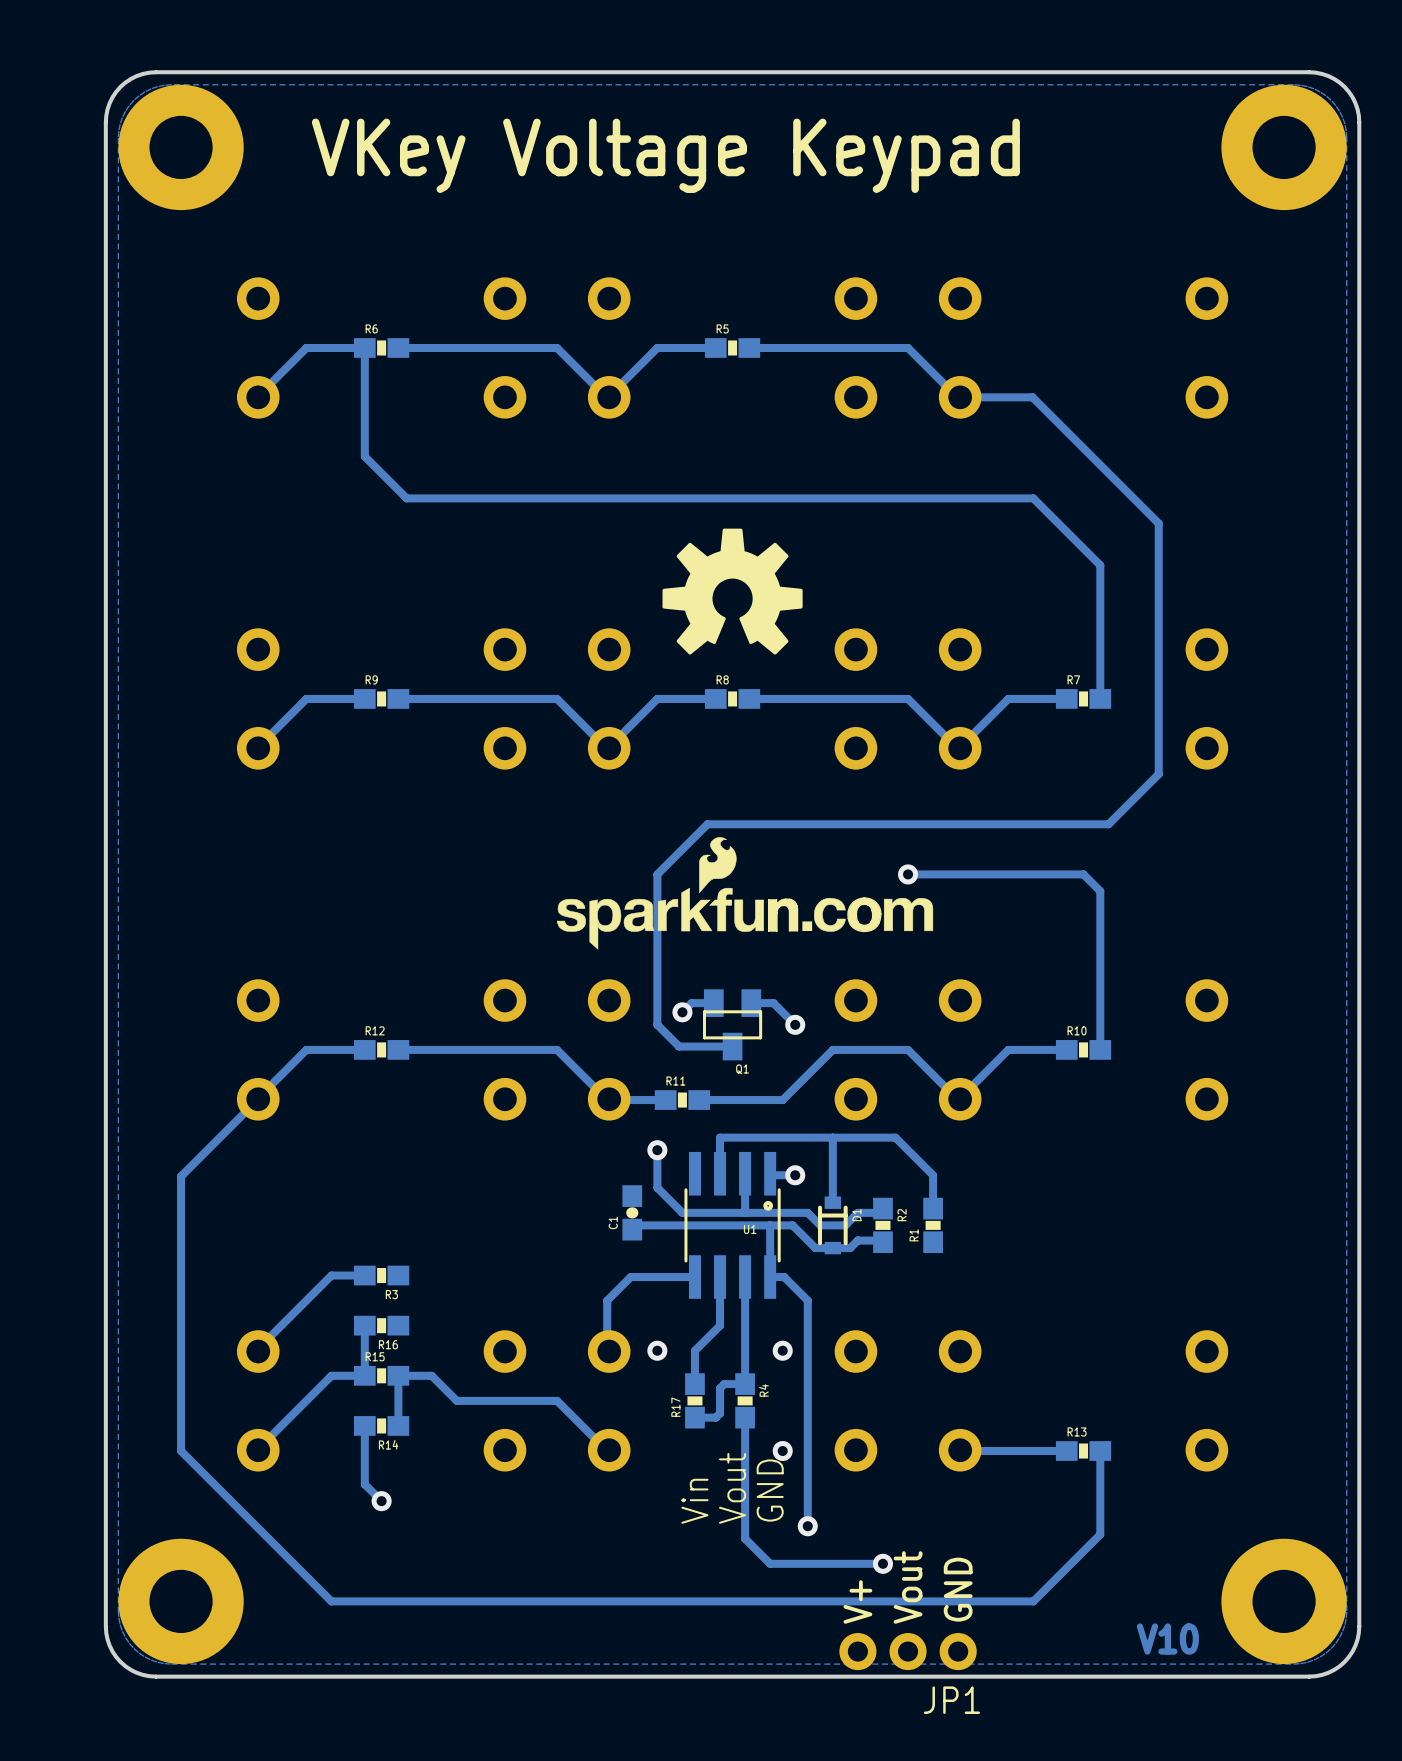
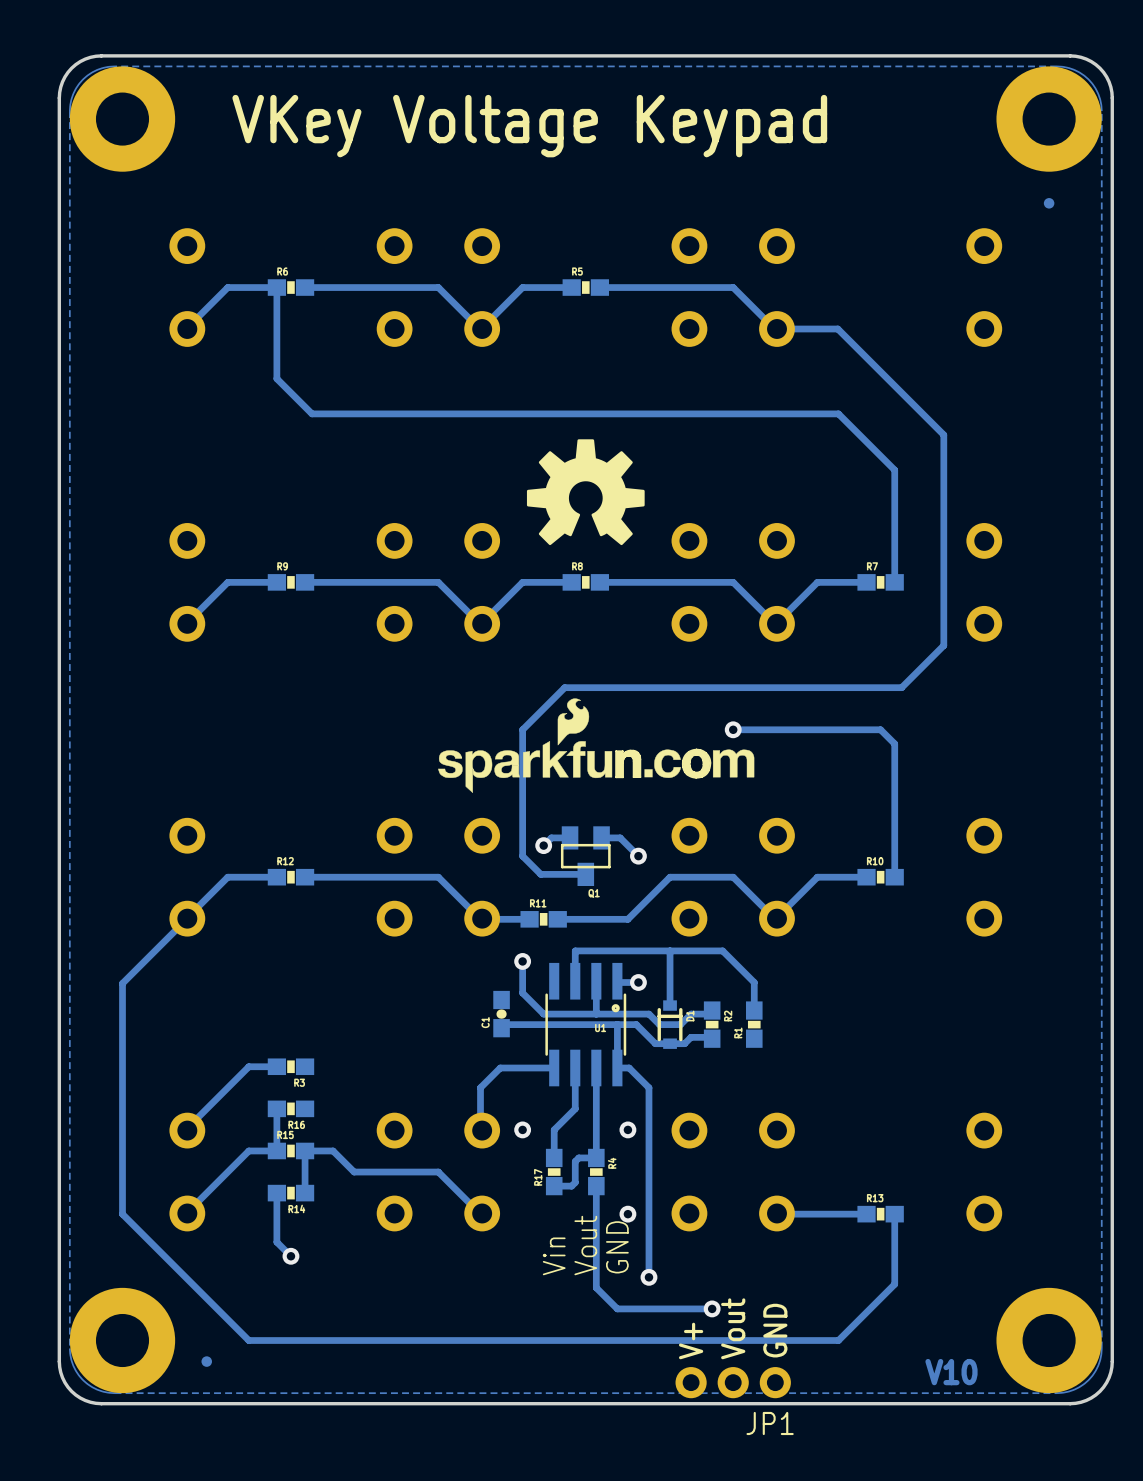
part: none -> (1049, 203)
part: none -> (206, 1361)

